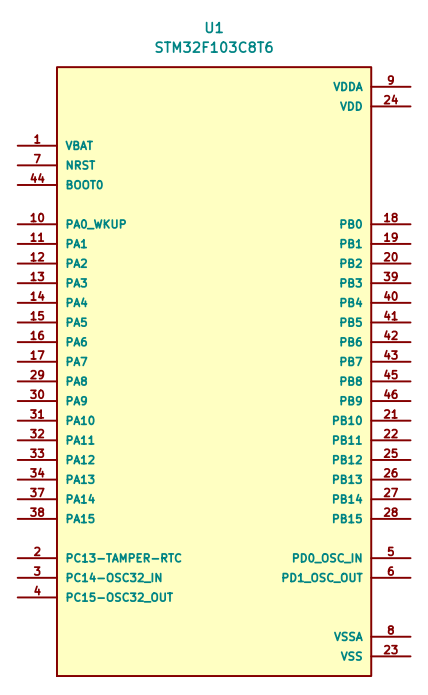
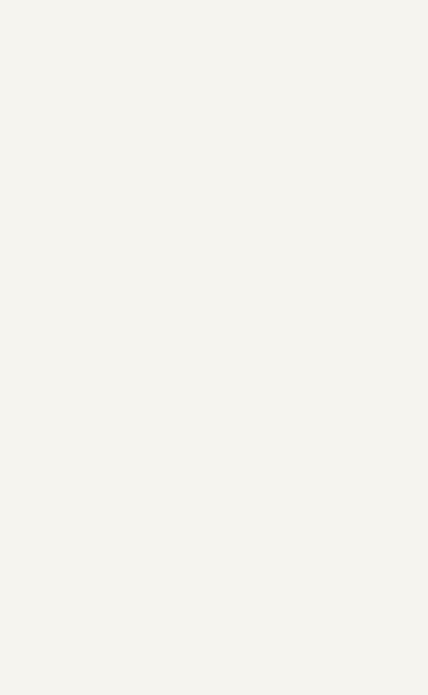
U1: STM32F103C8T6 (214, 371) -> none

